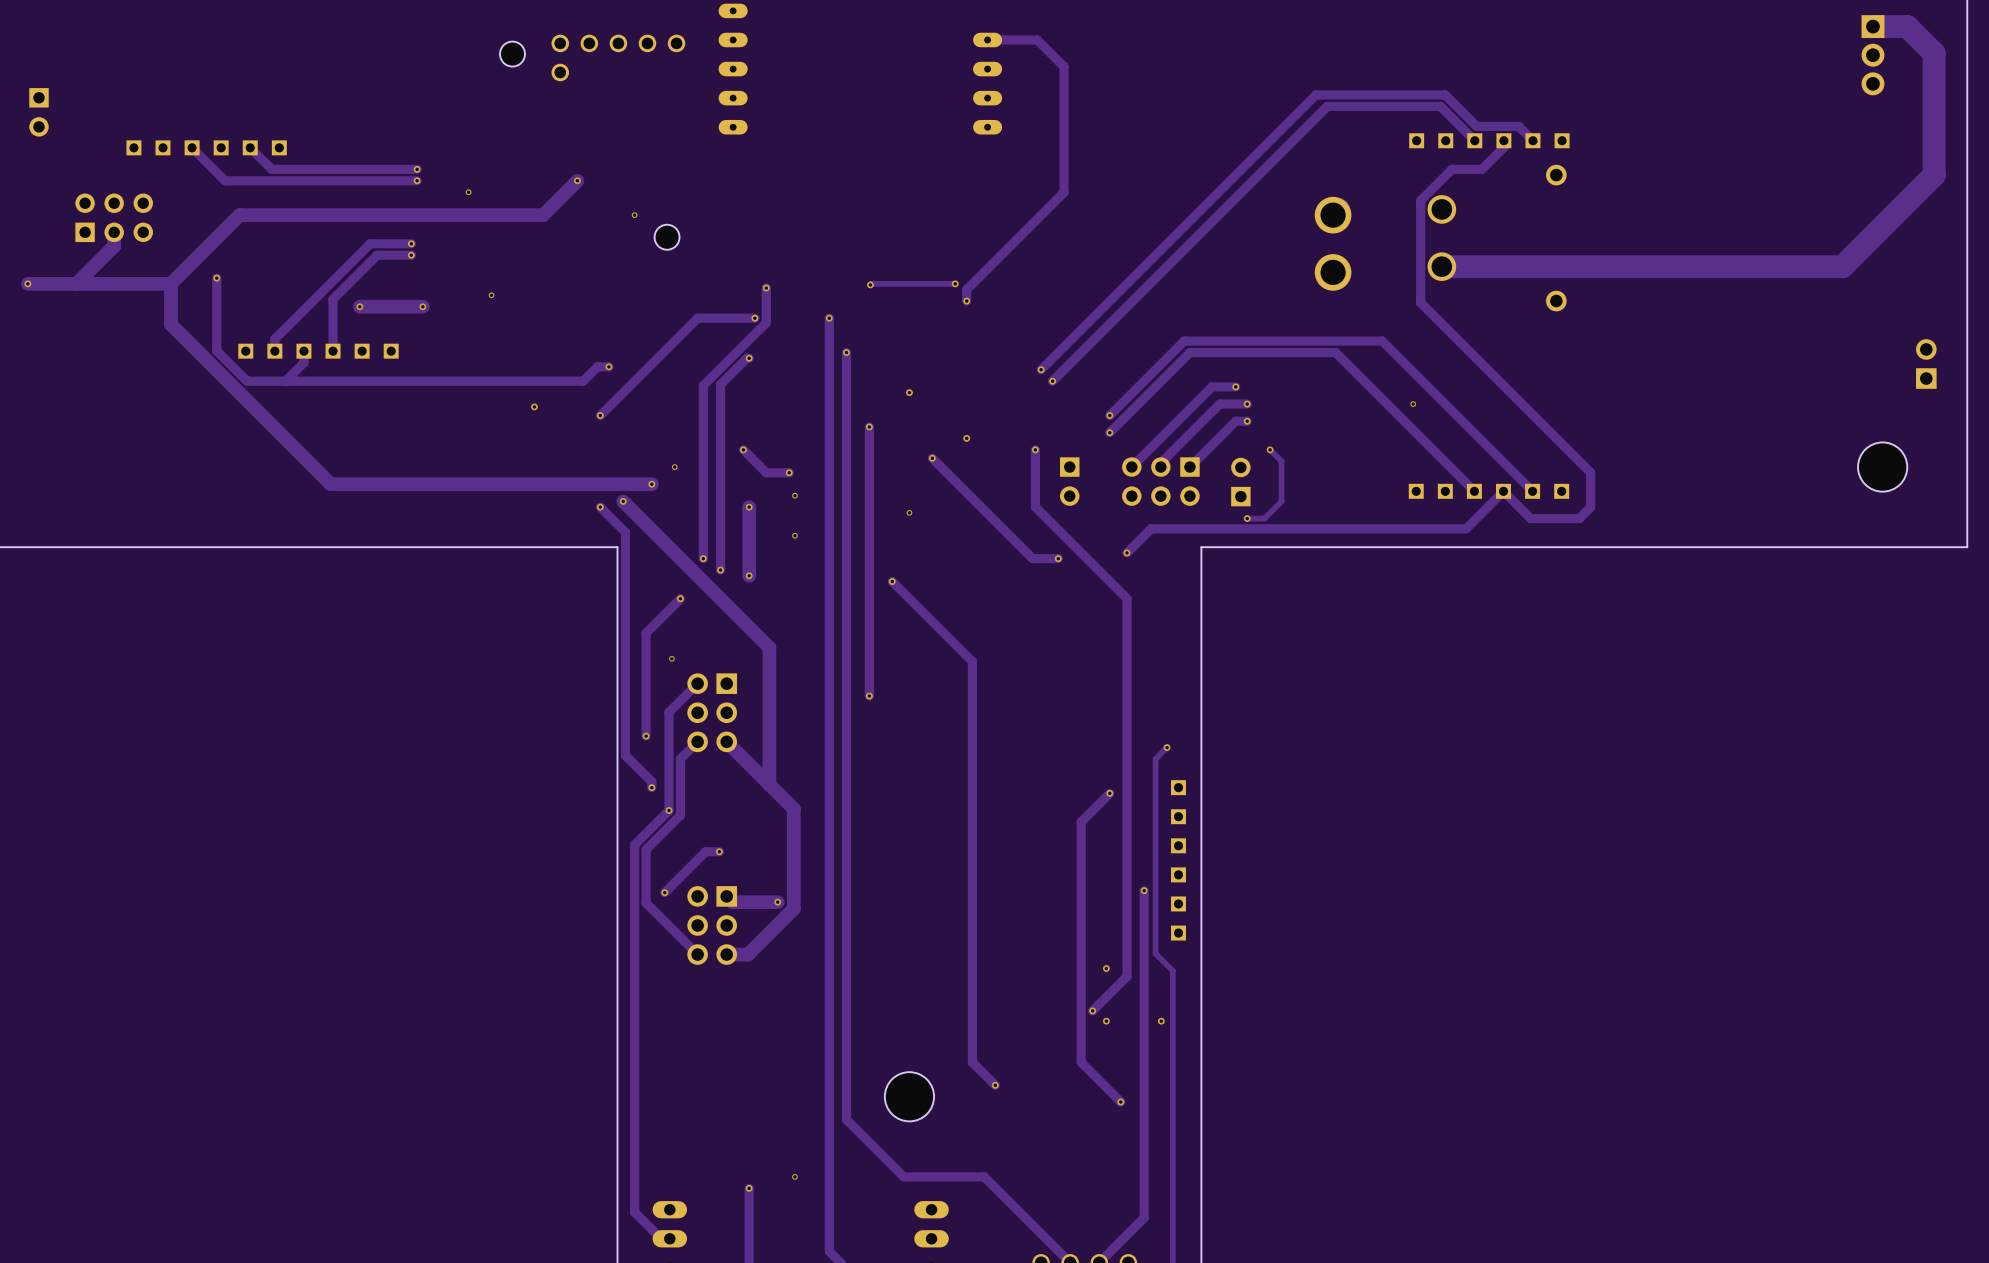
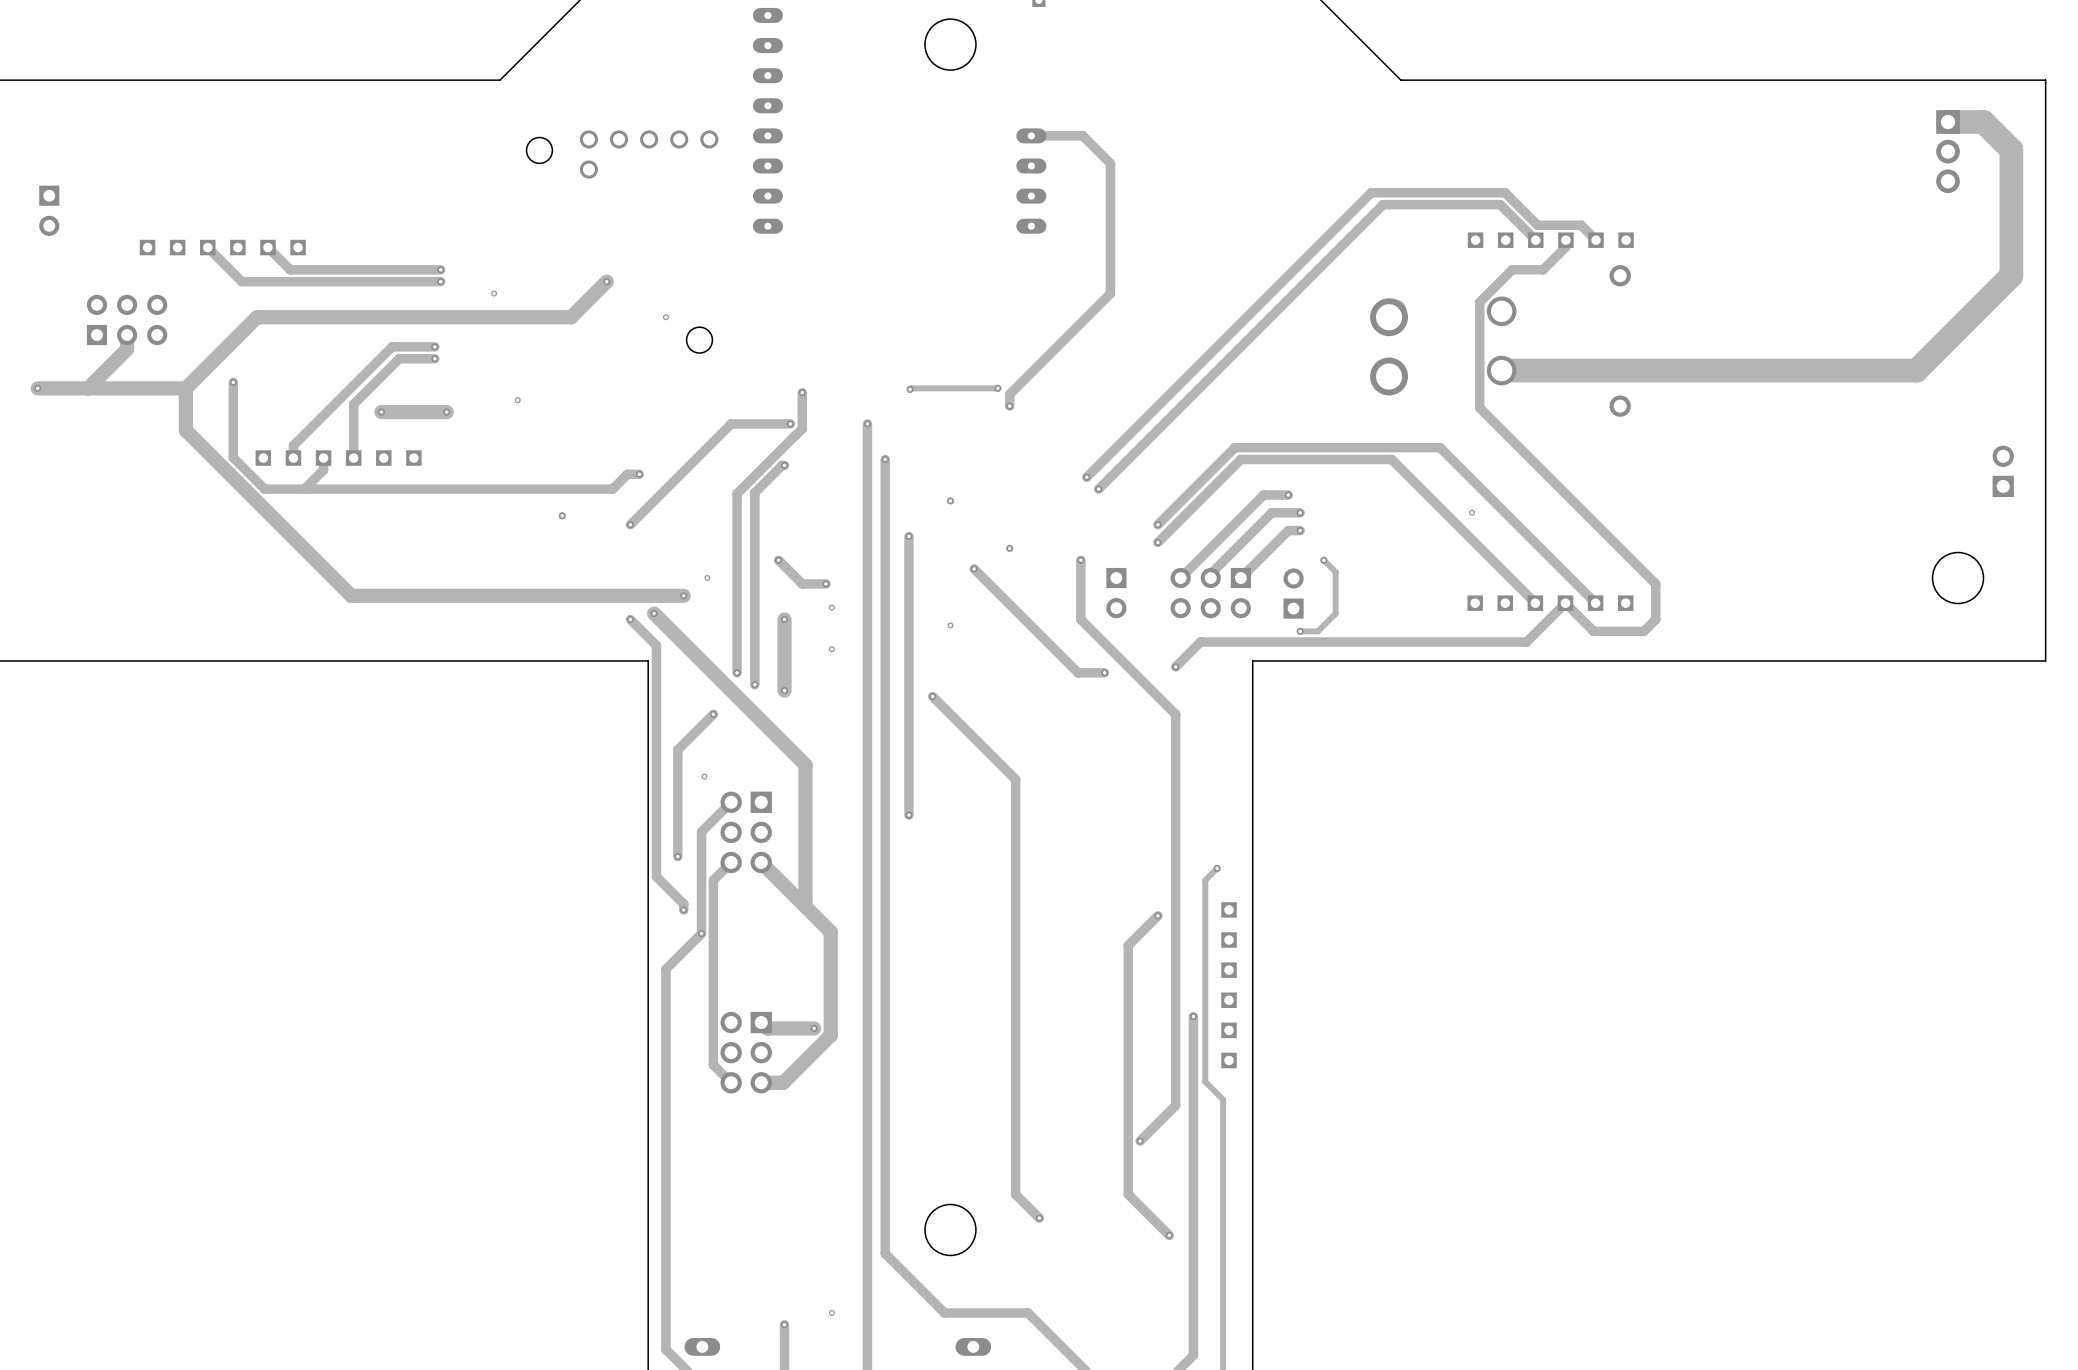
track: (680, 815) (646, 849) (646, 903) (680, 937) -> (713, 938) (713, 1064)
track: (719, 851) (705, 851) (664, 892) -> none
via: (719, 851) -> none
via: (664, 892) -> none
via: (1106, 968) -> none
via: (1106, 1021) -> none
via: (1161, 1021) -> none

